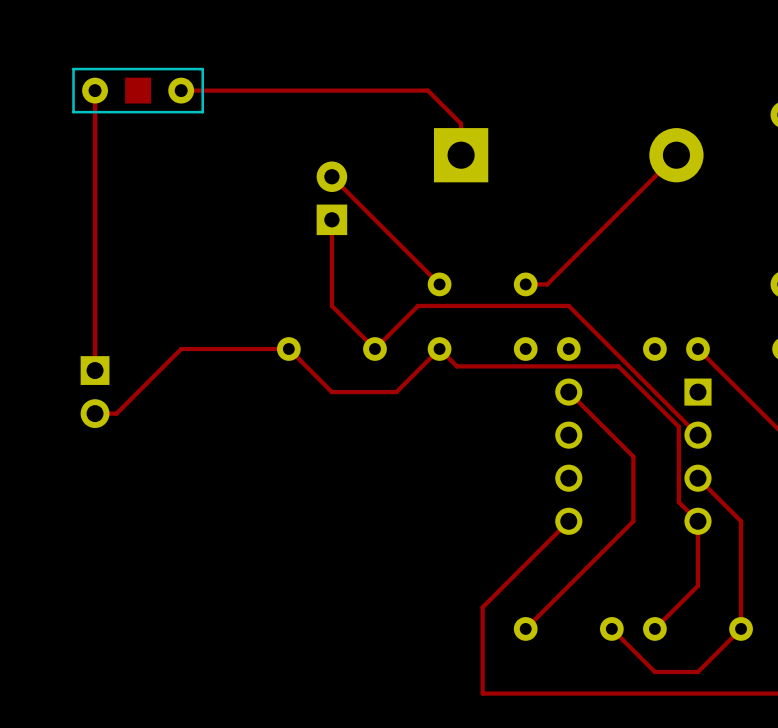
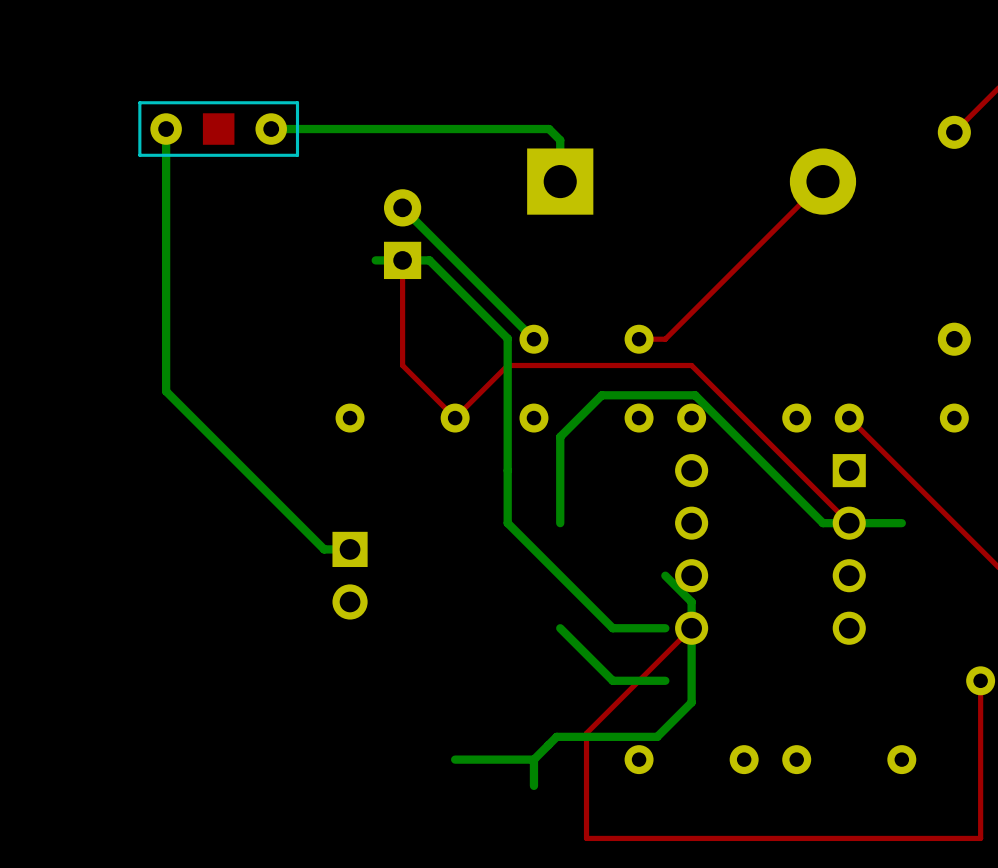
top track: (95, 90) (95, 370) -> none
part position: (138, 90) -> (218, 129)
top track: (181, 90) (427, 90) (461, 123) -> none
bottom track: none -> (166, 129) (166, 391) (324, 549) (350, 549)
bottom track: none -> (271, 129) (549, 129) (560, 140) (560, 181)
top track: (331, 176) (439, 284) -> none
bottom track: none -> (402, 207) (533, 339)
bottom track: none -> (375, 260) (429, 260) (507, 338) (507, 523) (612, 628) (665, 628)
part position: (95, 392) -> (350, 575)
top track: (568, 392) (633, 456) (633, 521) (525, 628) -> none
top track: (95, 413) (116, 413) (181, 349) (288, 349) (331, 392) (396, 392) (439, 349) (456, 366) (618, 366) (678, 426) (678, 502) (697, 521) (697, 585) (654, 628) -> none
bottom track: none -> (901, 523) (822, 523) (695, 395) (601, 395) (560, 436) (560, 523)
bottom track: none -> (665, 575) (691, 601) (691, 702) (657, 736) (556, 736) (533, 759)
top track: (697, 478) (741, 521) (741, 628) (697, 672) (654, 672) (611, 628) -> none
bottom track: none -> (560, 628) (612, 680) (665, 680)
bottom track: none -> (533, 759) (455, 759)
bottom track: none -> (533, 759) (533, 785)

